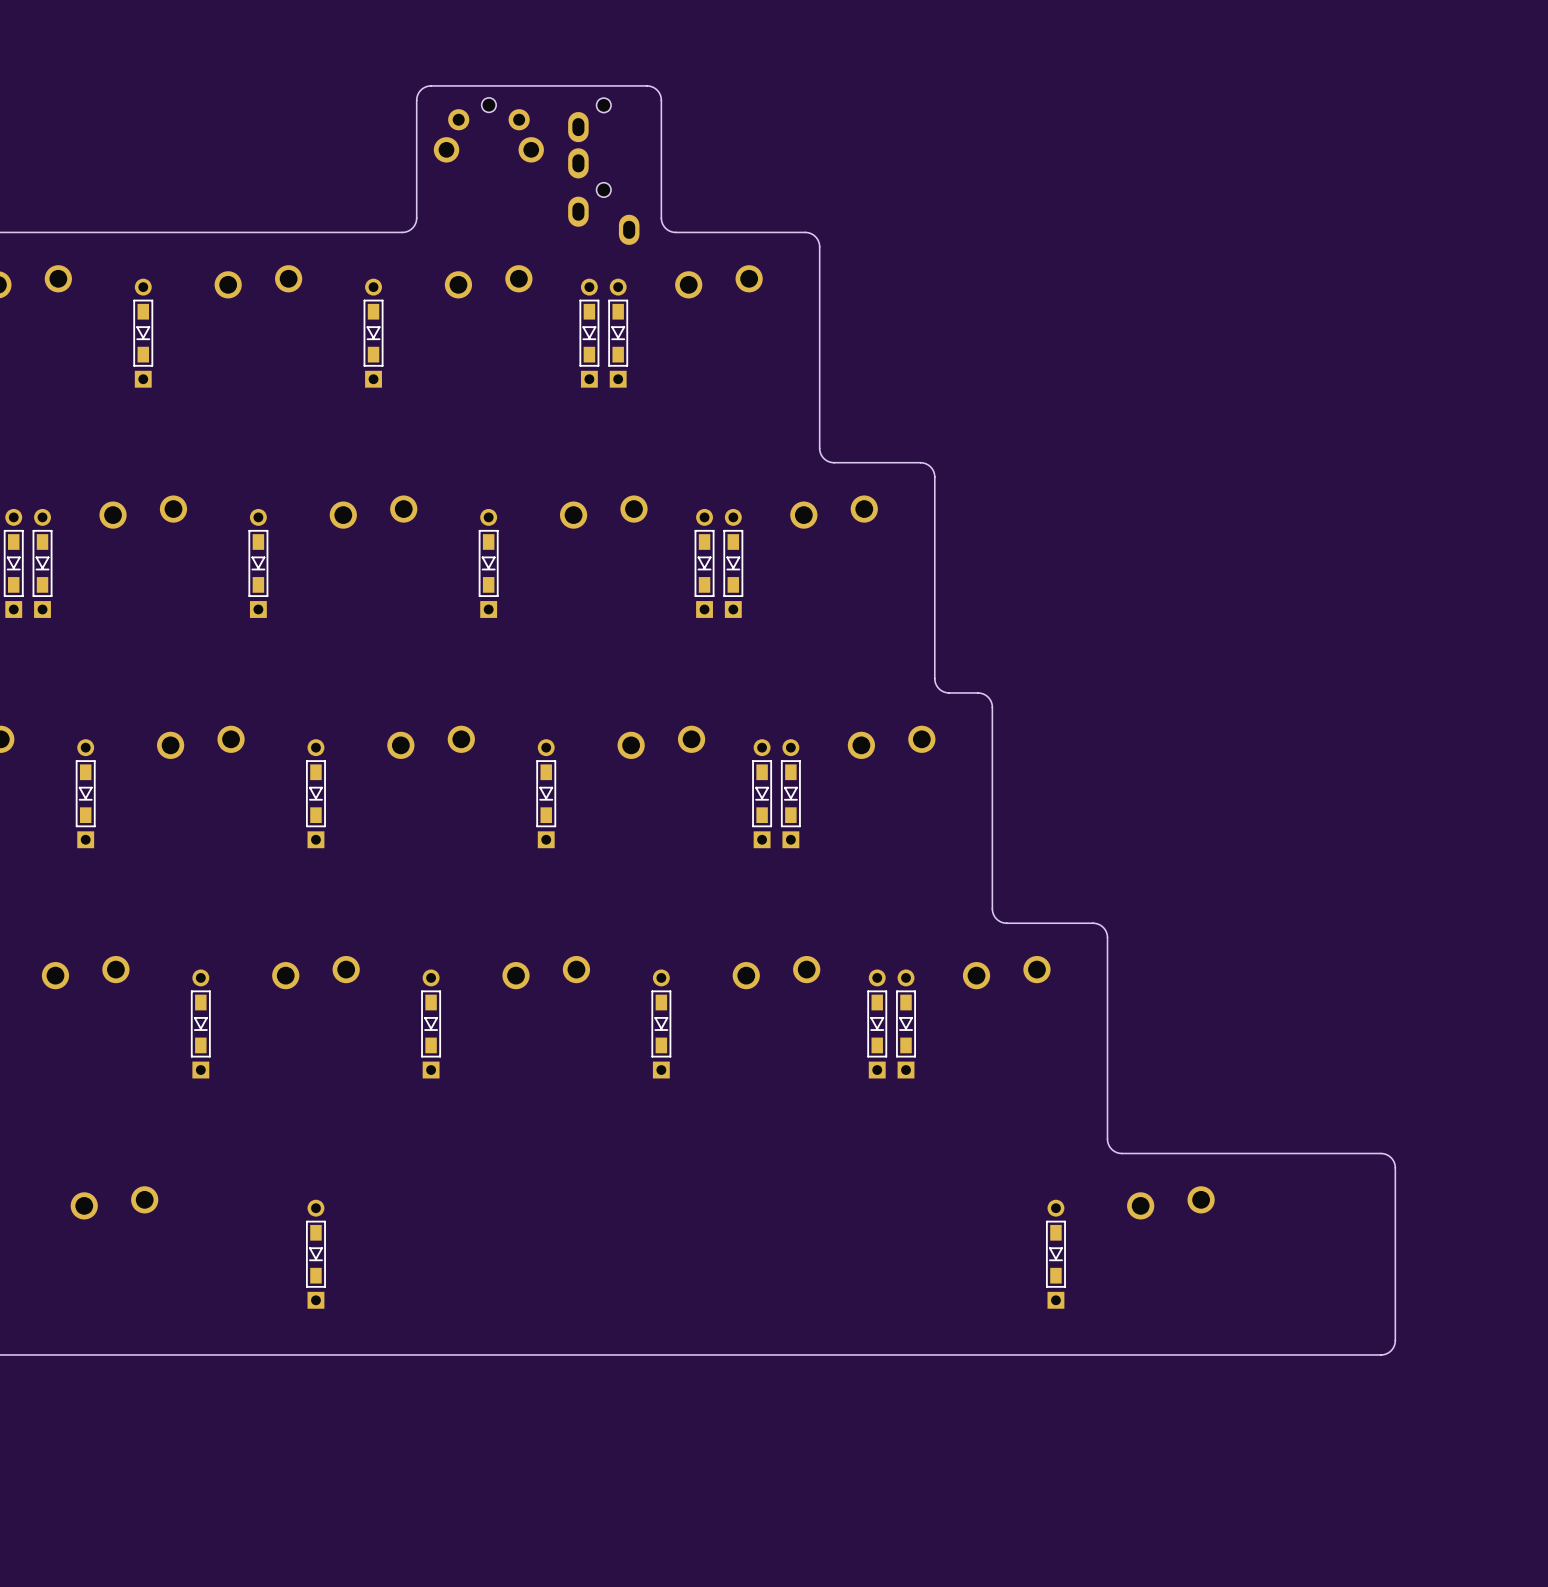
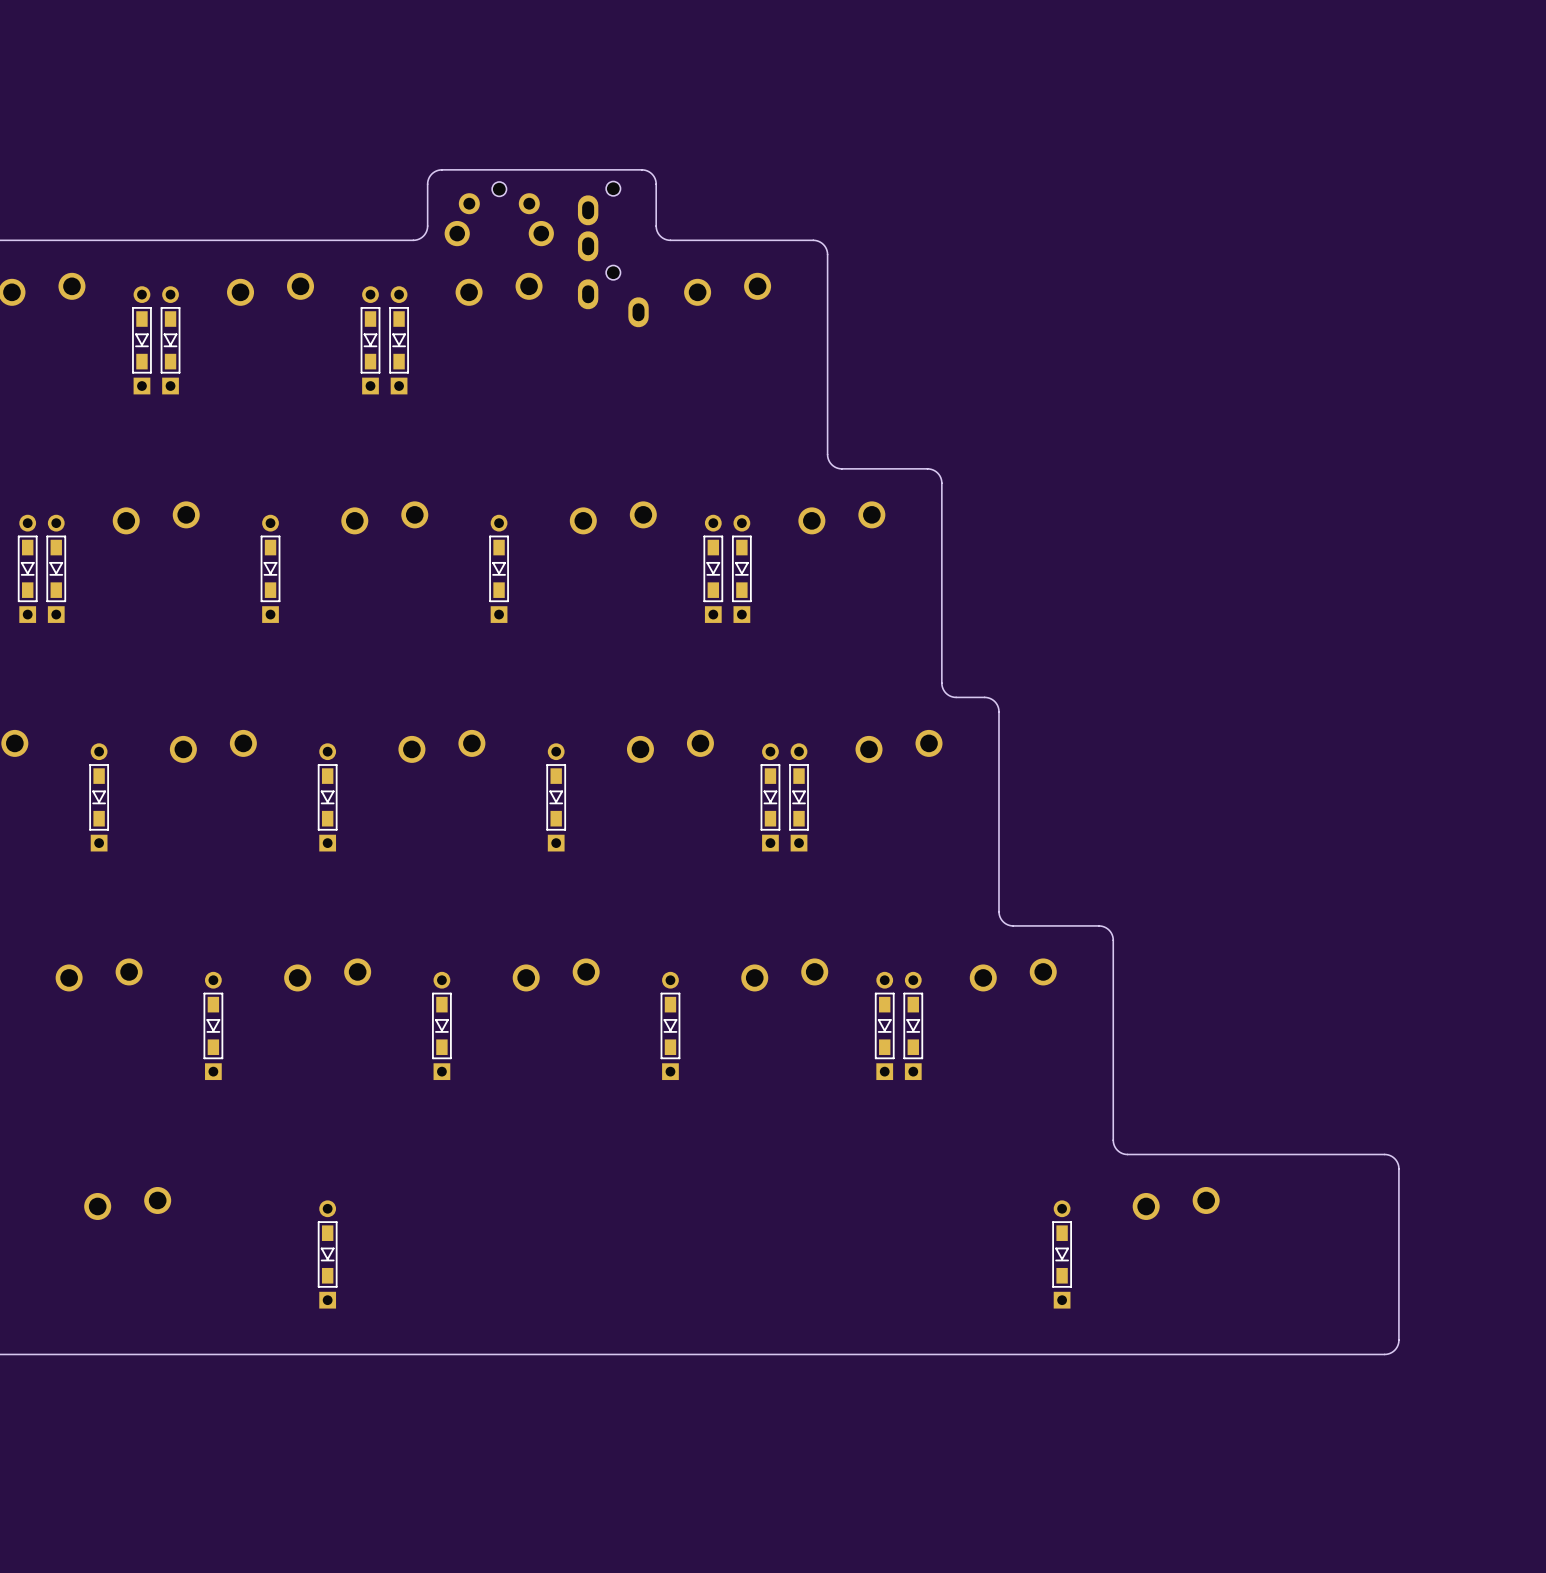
part position: (488, 130) -> (499, 214)
part position: (603, 171) -> (613, 254)
board edge: (416, 175) (416, 98) (419, 91) (425, 87) (650, 86) (657, 90) (661, 98) (661, 219) (665, 228) (675, 232) -> (427, 184) (431, 174) (441, 169) (645, 170) (651, 174) (655, 180) (656, 226) (658, 233) (666, 239) (684, 240)
part: none -> (141, 340)
part: (143, 333) -> none
part: none -> (170, 340)
part: none -> (370, 340)
part: (373, 333) -> none
part: none -> (399, 340)
part: (589, 333) -> none
part: (618, 333) -> none

